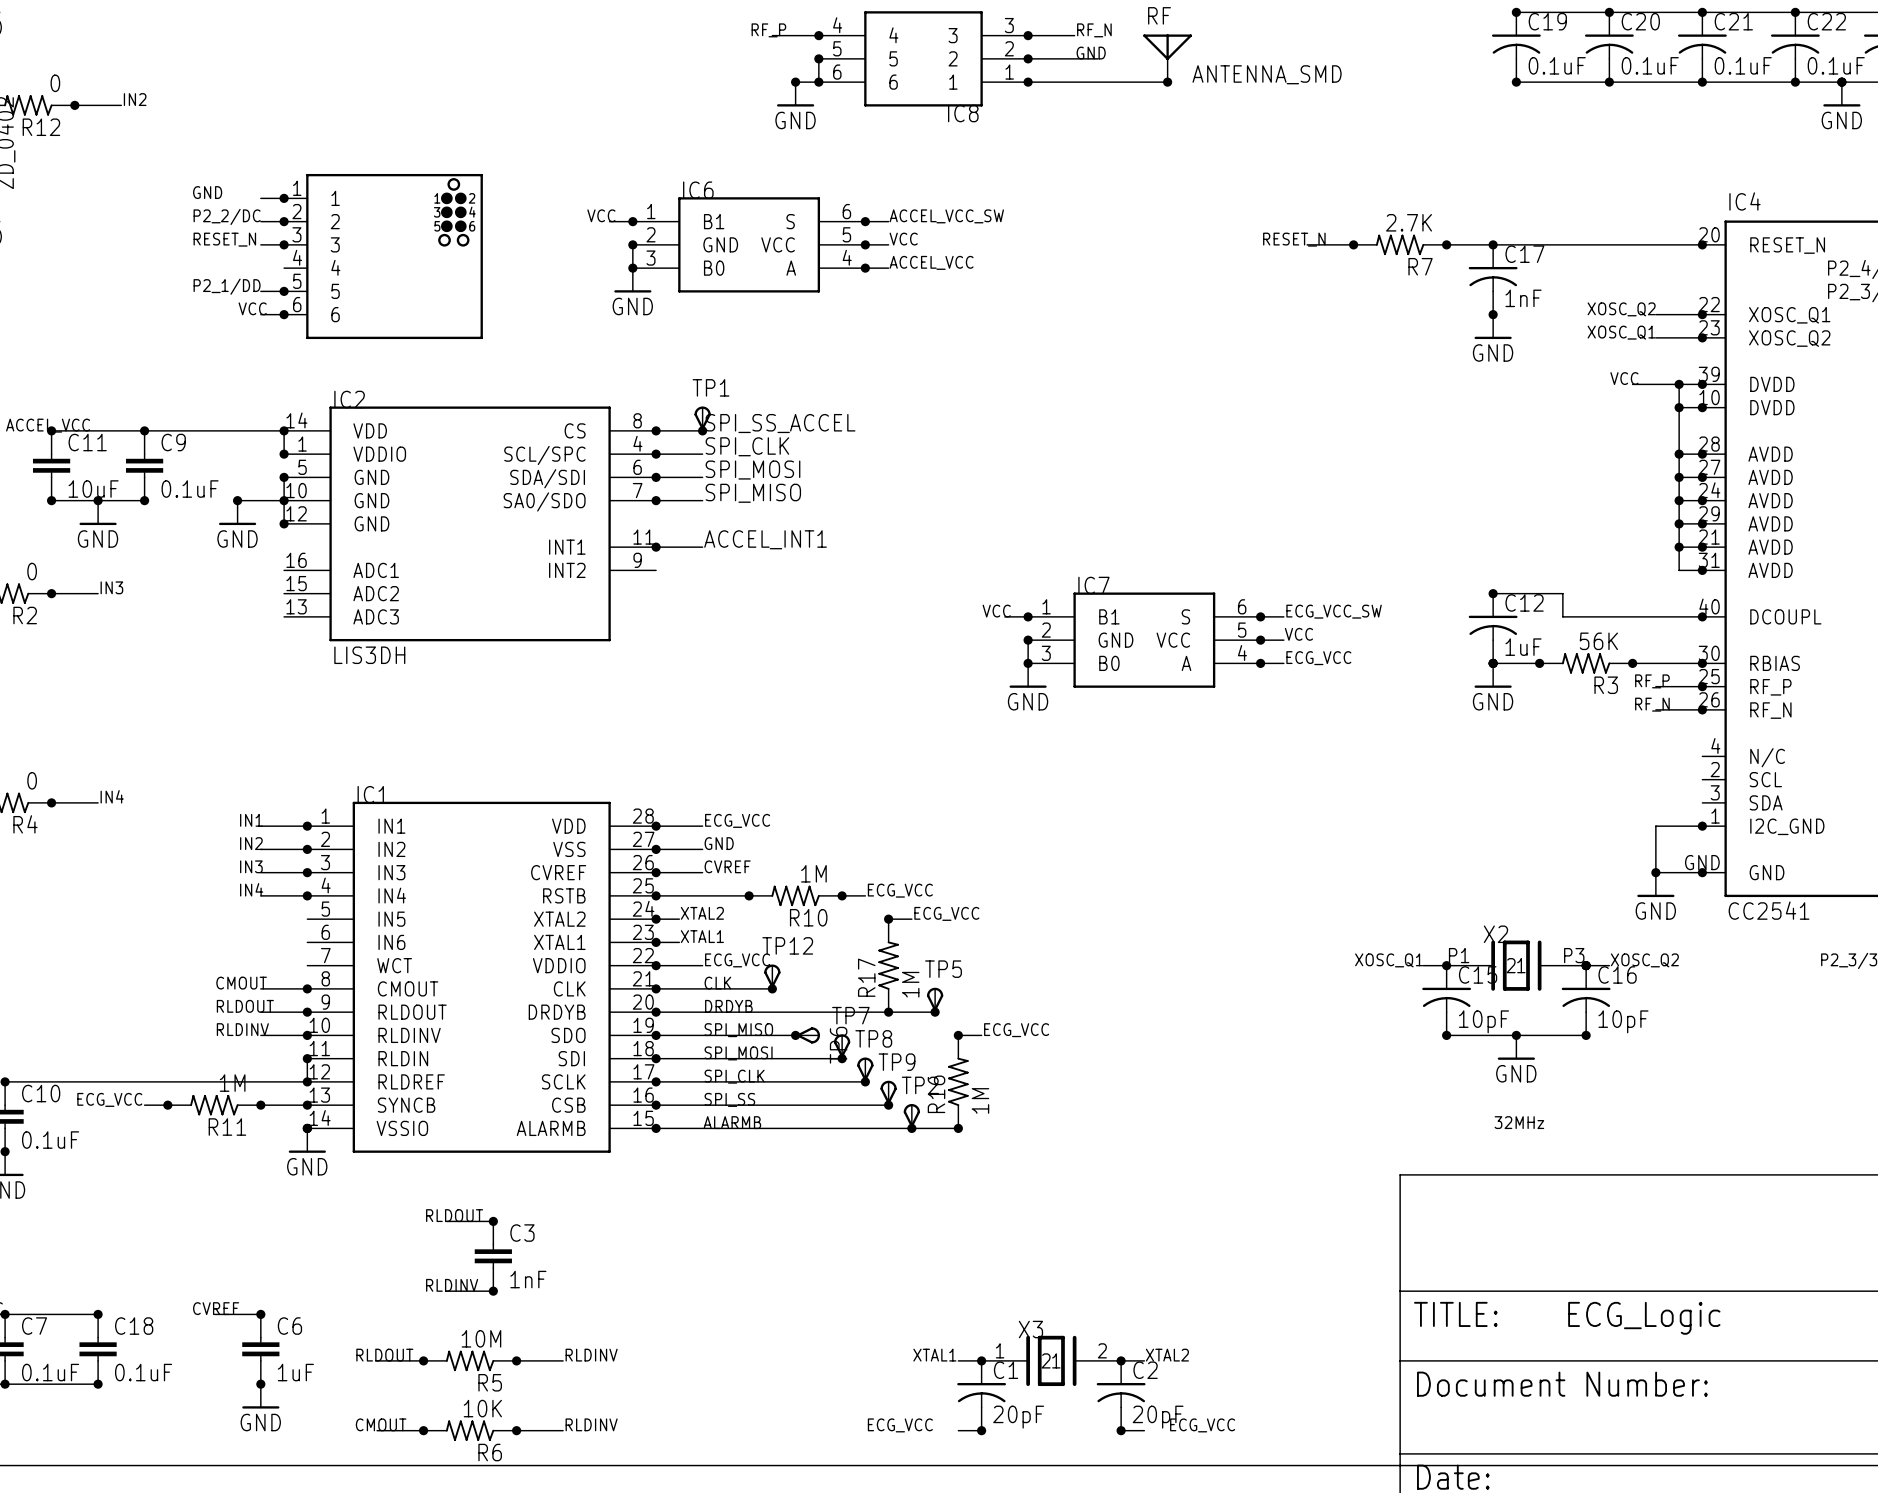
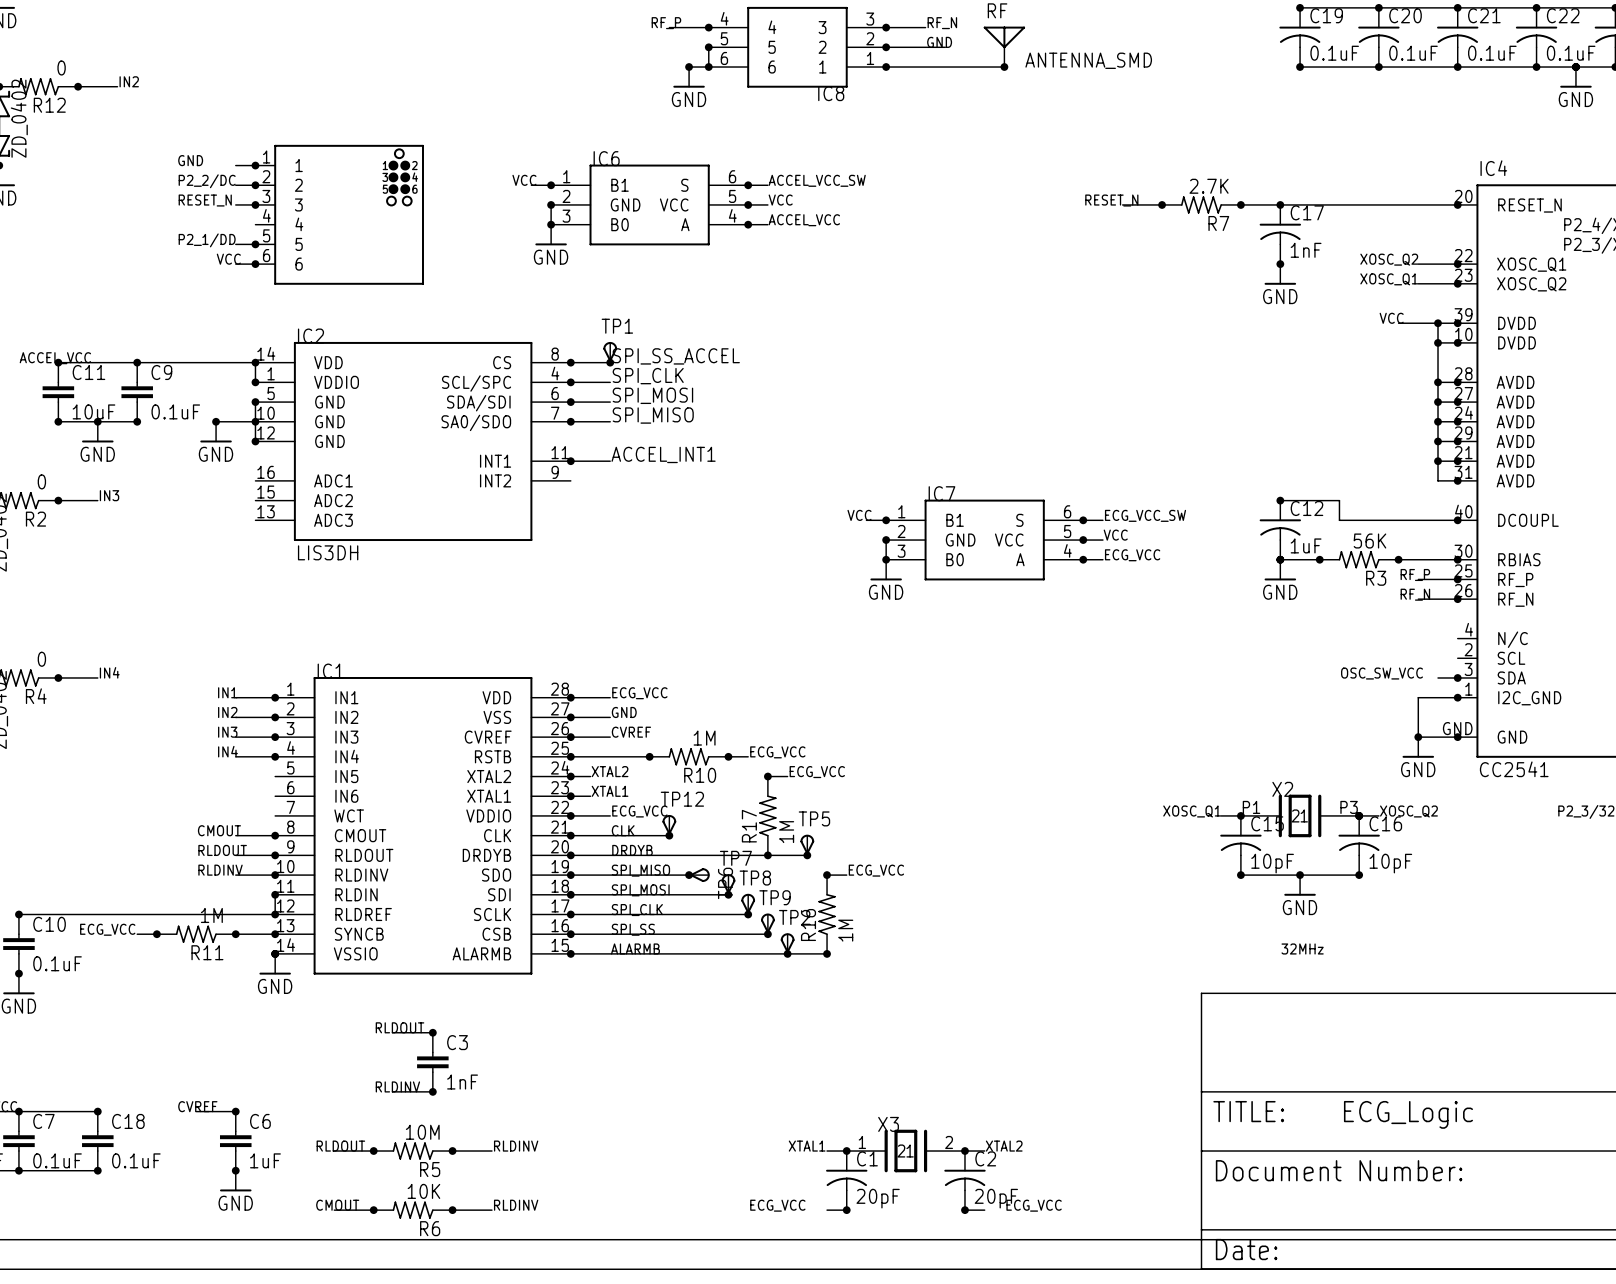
label: none -> OSC_SW_VCC (1382, 673)
wire: none -> (1438, 677) (1457, 677)
junction: none -> (1457, 677)

